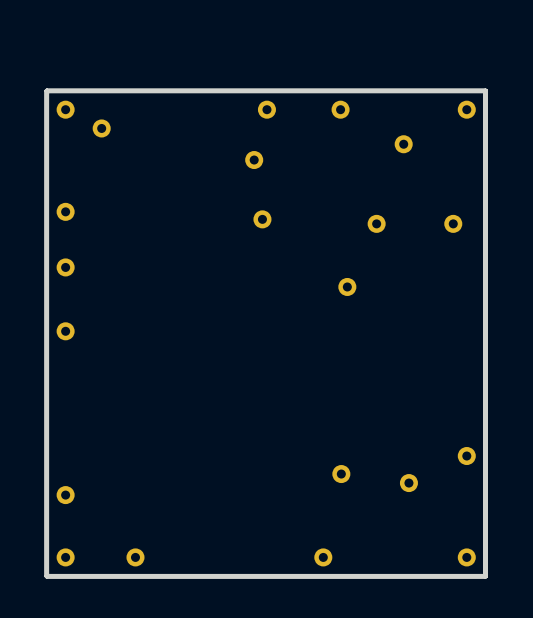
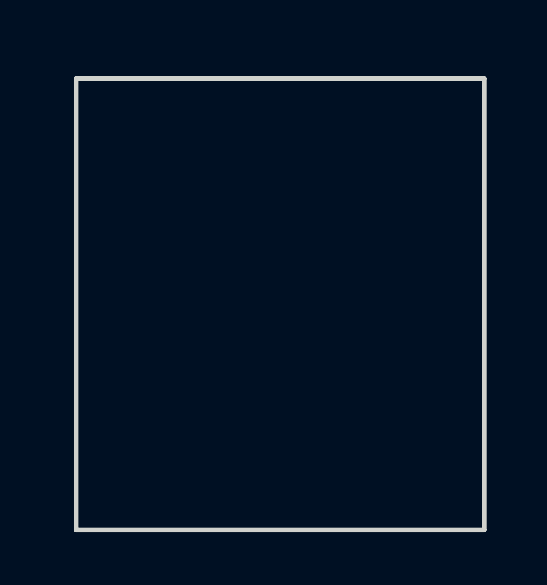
part: (65, 109) -> none
part: (266, 109) -> none
part: (340, 109) -> none
part: (466, 109) -> none
part: (101, 128) -> none
part: (403, 144) -> none
part: (254, 160) -> none
part: (65, 211) -> none
part: (262, 219) -> none
part: (376, 223) -> none
part: (453, 223) -> none
part: (65, 267) -> none
part: (347, 286) -> none
part: (65, 331) -> none
part: (466, 456) -> none
part: (341, 474) -> none
part: (408, 483) -> none
part: (65, 495) -> none
part: (65, 557) -> none
part: (135, 557) -> none
part: (323, 557) -> none
part: (466, 557) -> none

